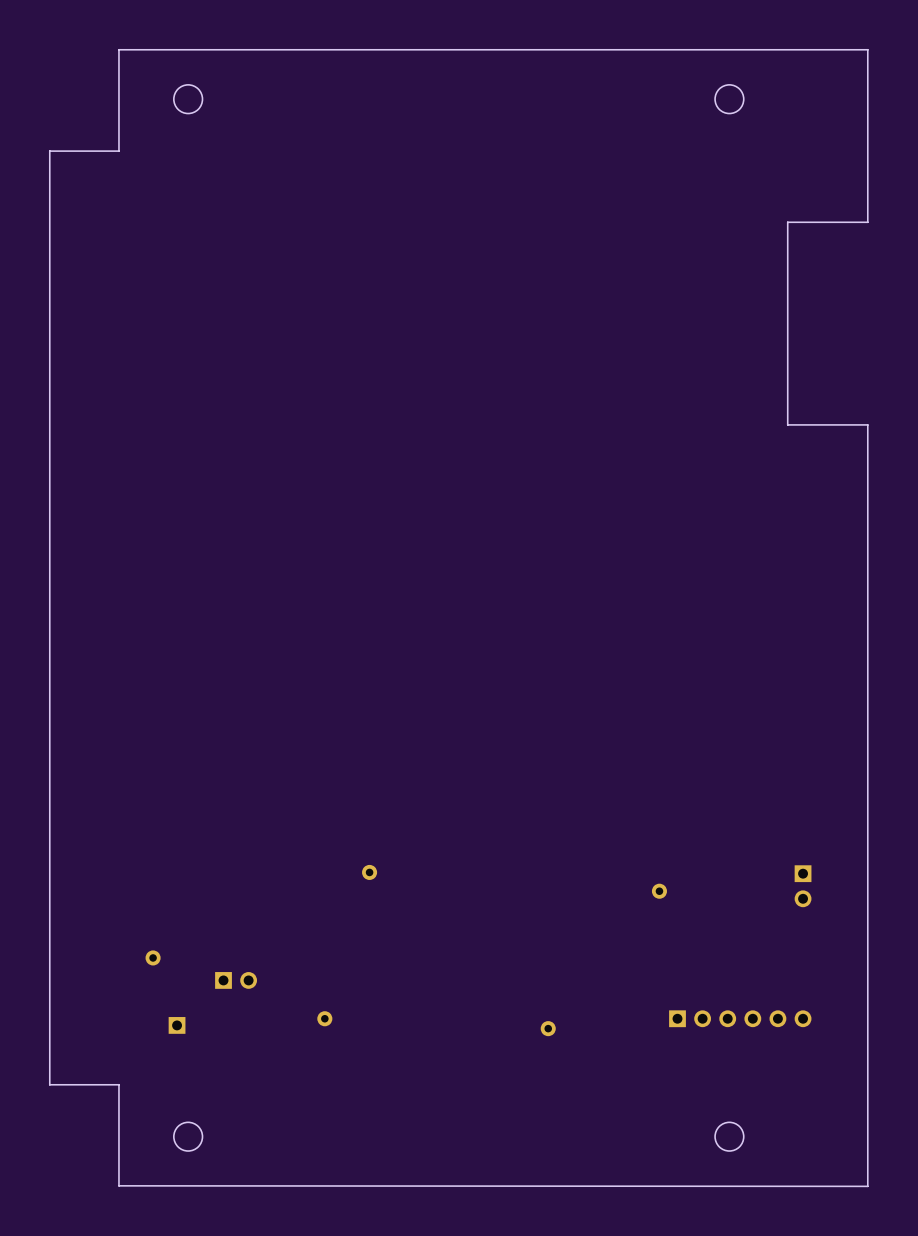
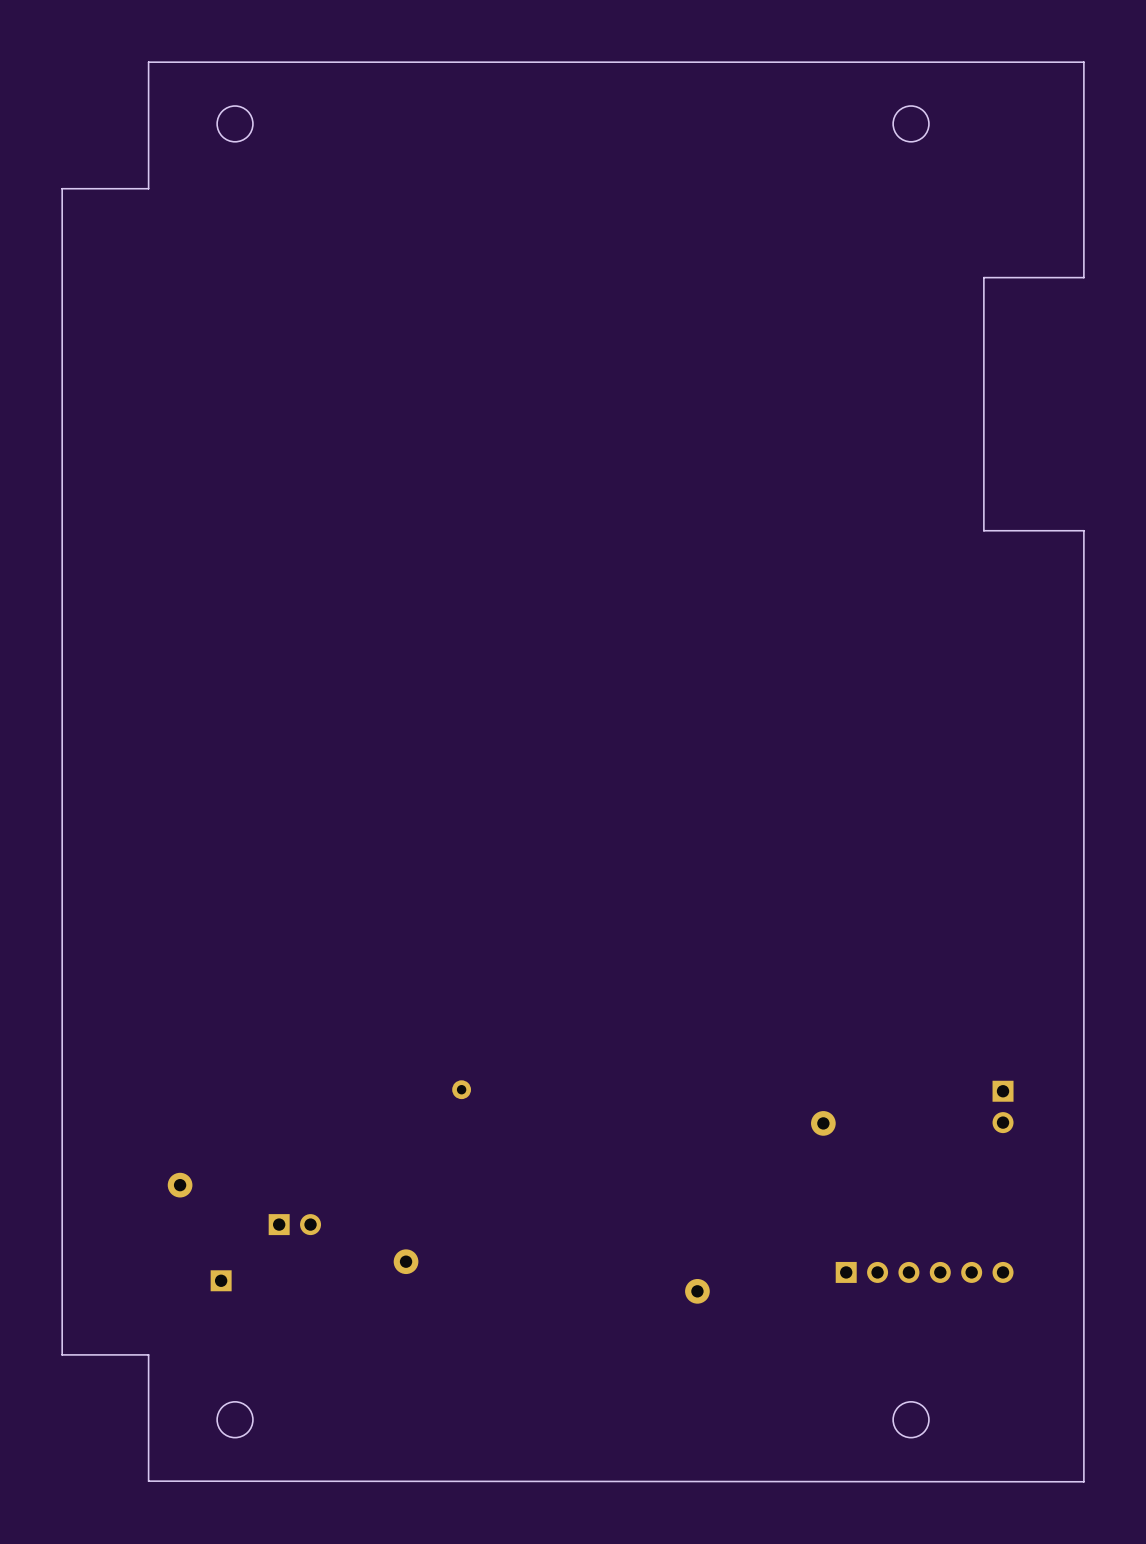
part footprint: [651, 883, 667, 899] -> [811, 1111, 836, 1136]
part: none -> (180, 1185)
part: (153, 957) -> none
part footprint: [317, 1011, 333, 1027] -> [393, 1249, 419, 1275]
part: (548, 1028) -> none
part: none -> (697, 1291)

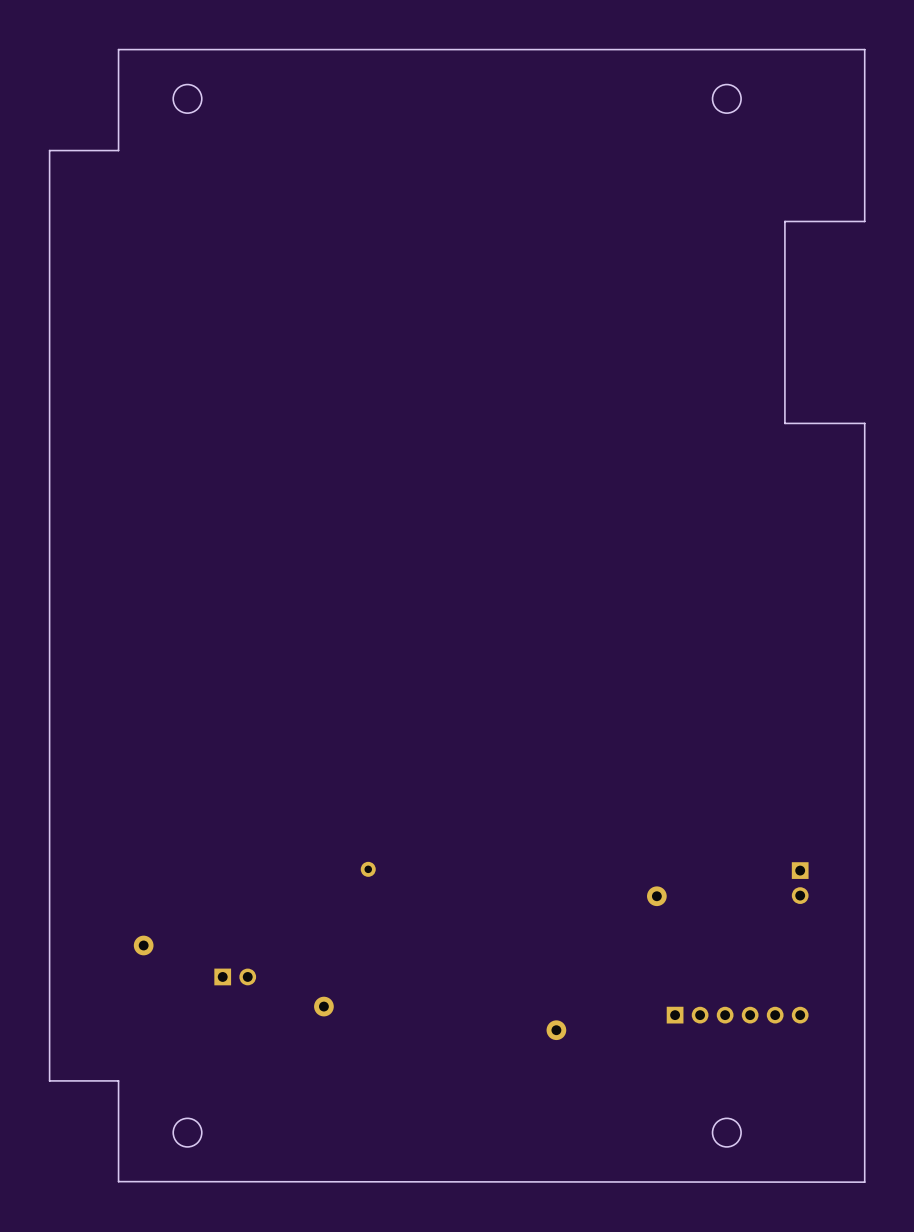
part: (221, 1280) -> none

